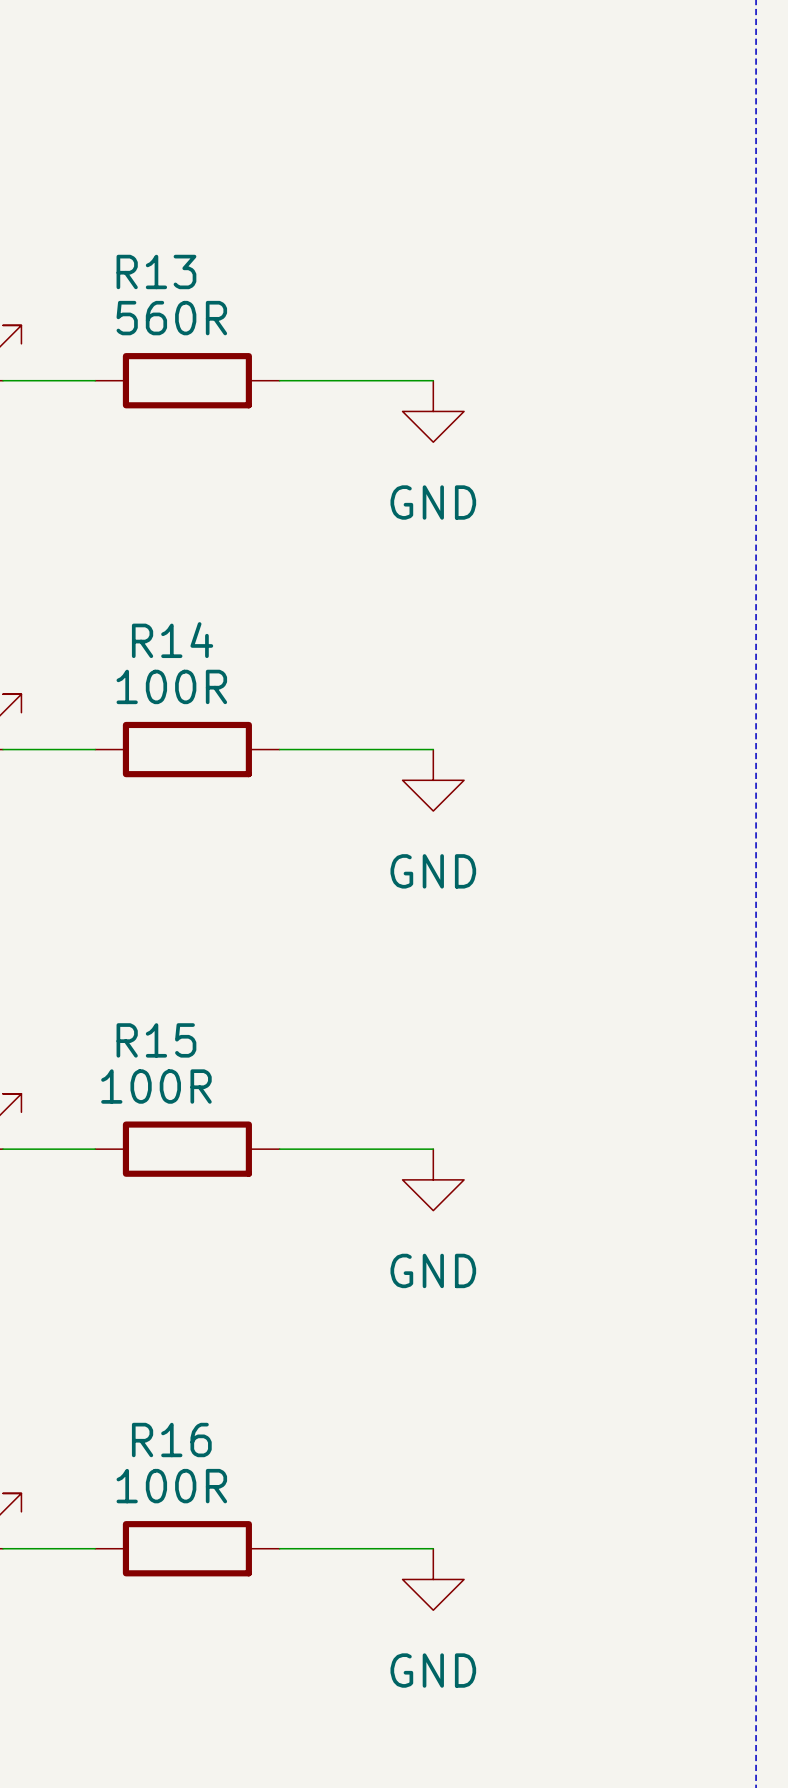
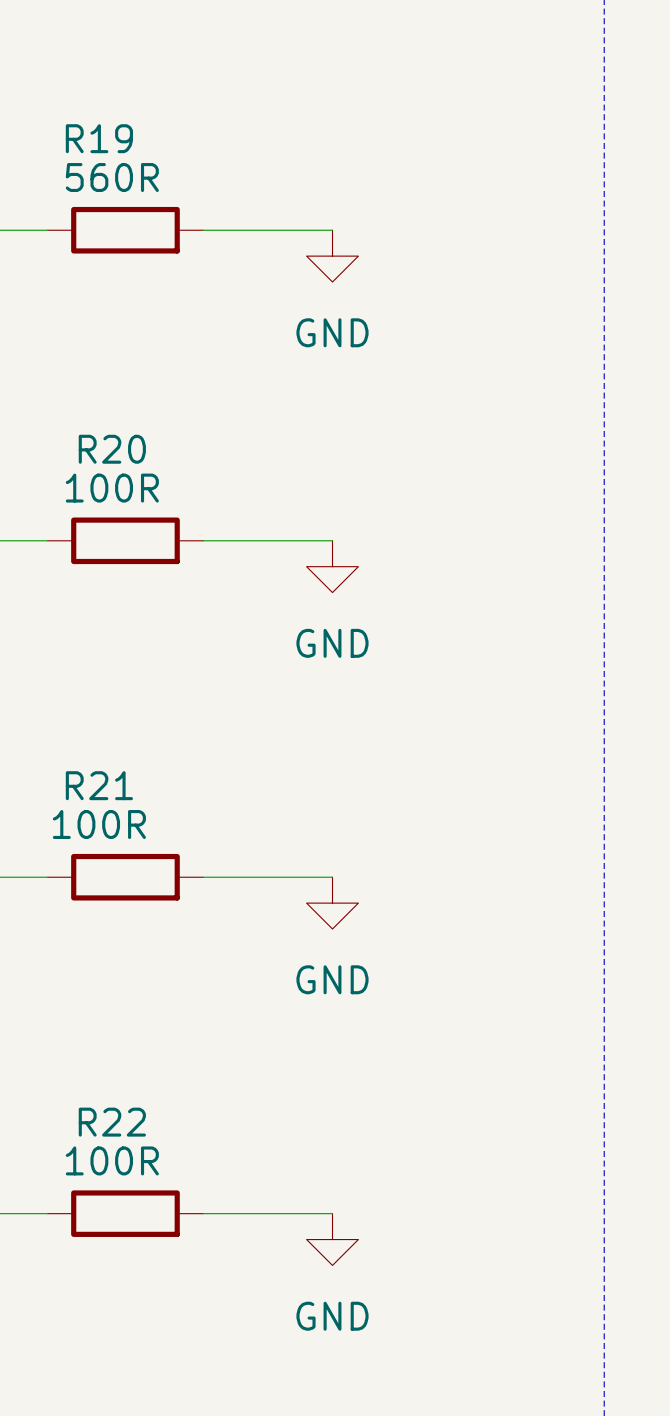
R13 name: R13 (156, 271) -> R19 (99, 138)
R14 name: R14 (172, 640) -> R20 (112, 449)
R15 name: R15 (156, 1040) -> R21 (99, 785)
R16 name: R16 (171, 1440) -> R22 (112, 1122)

